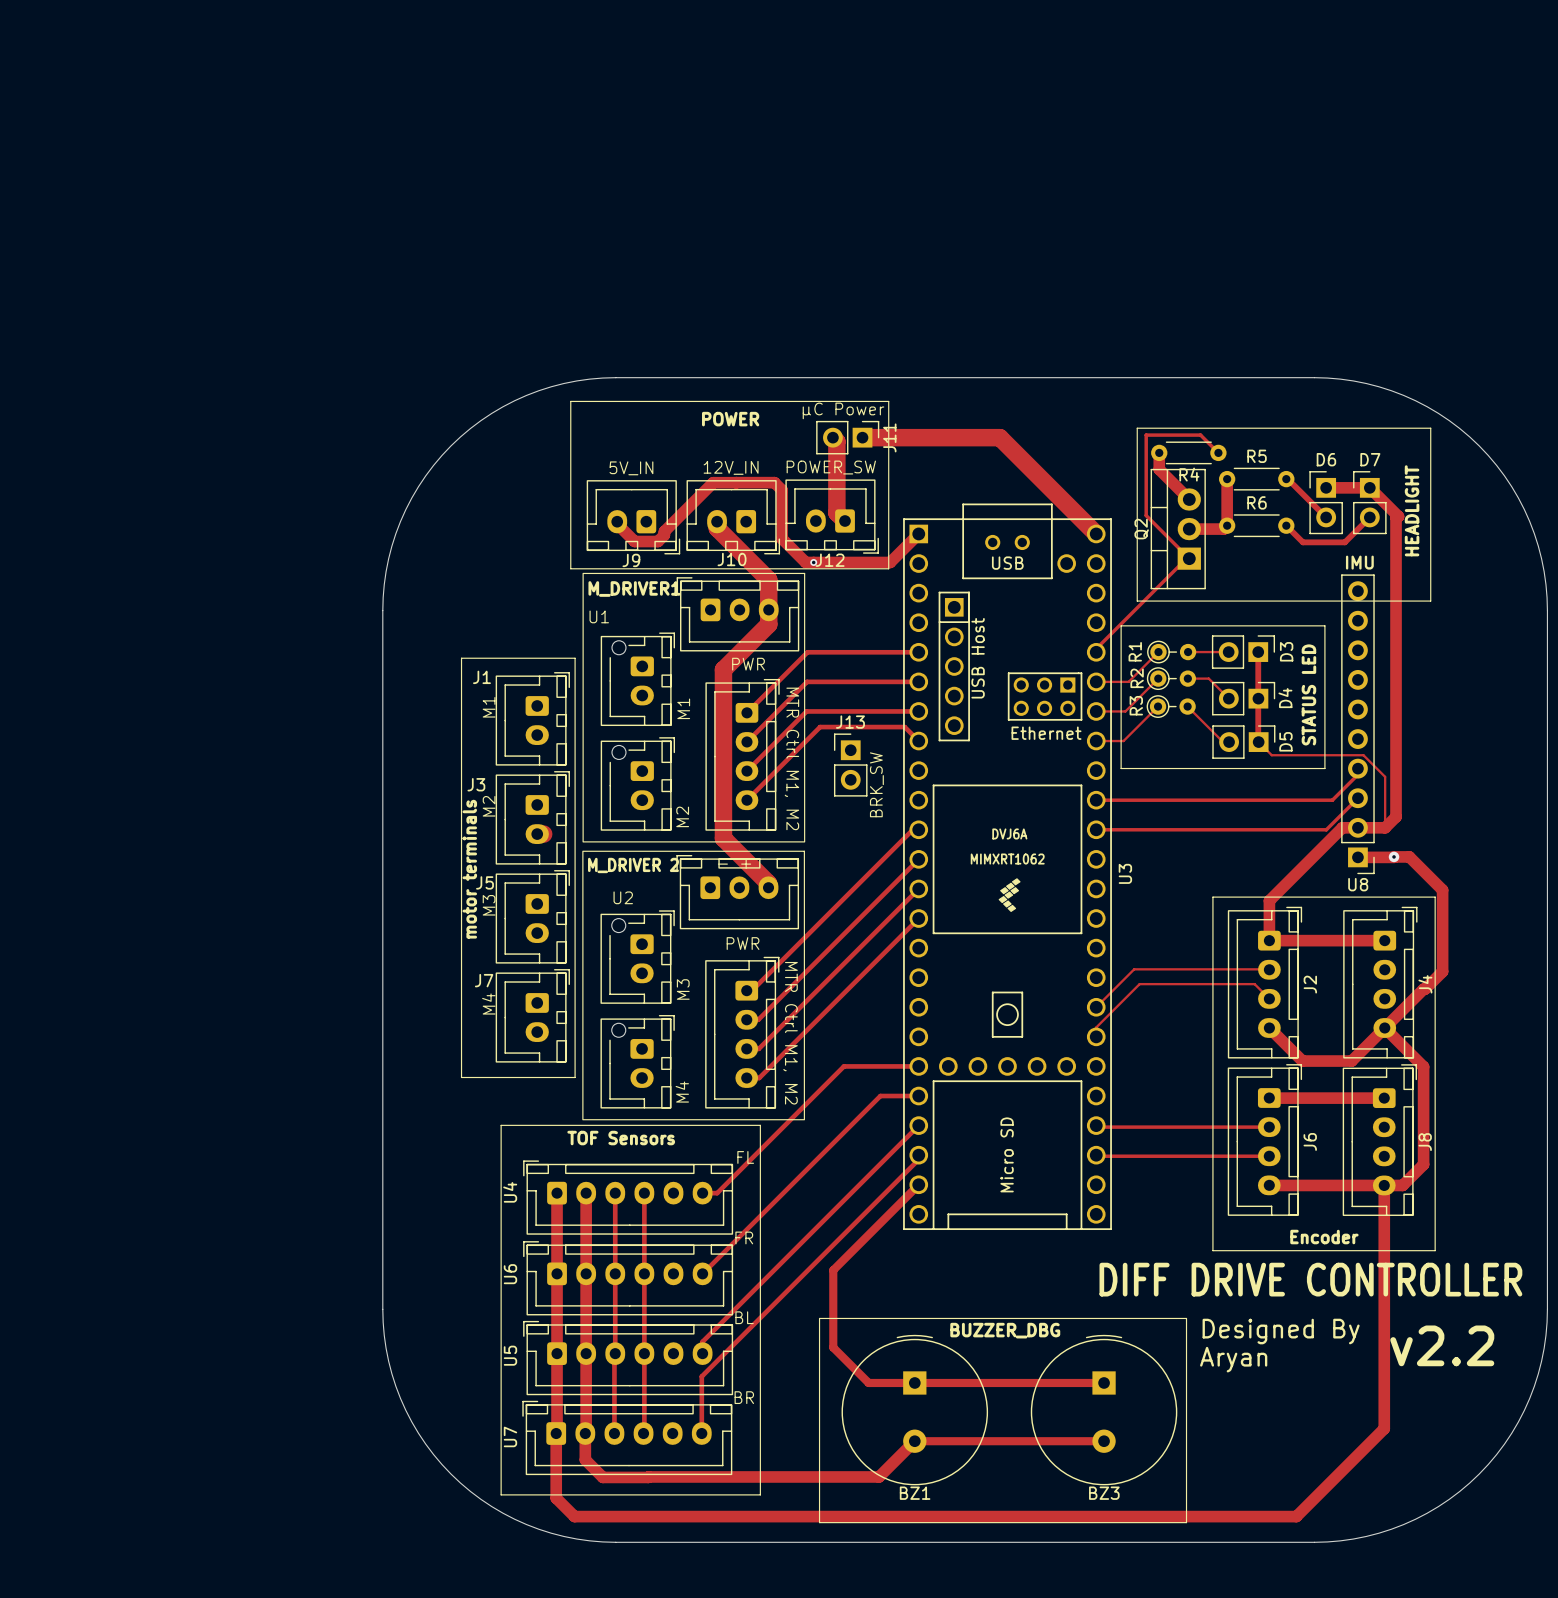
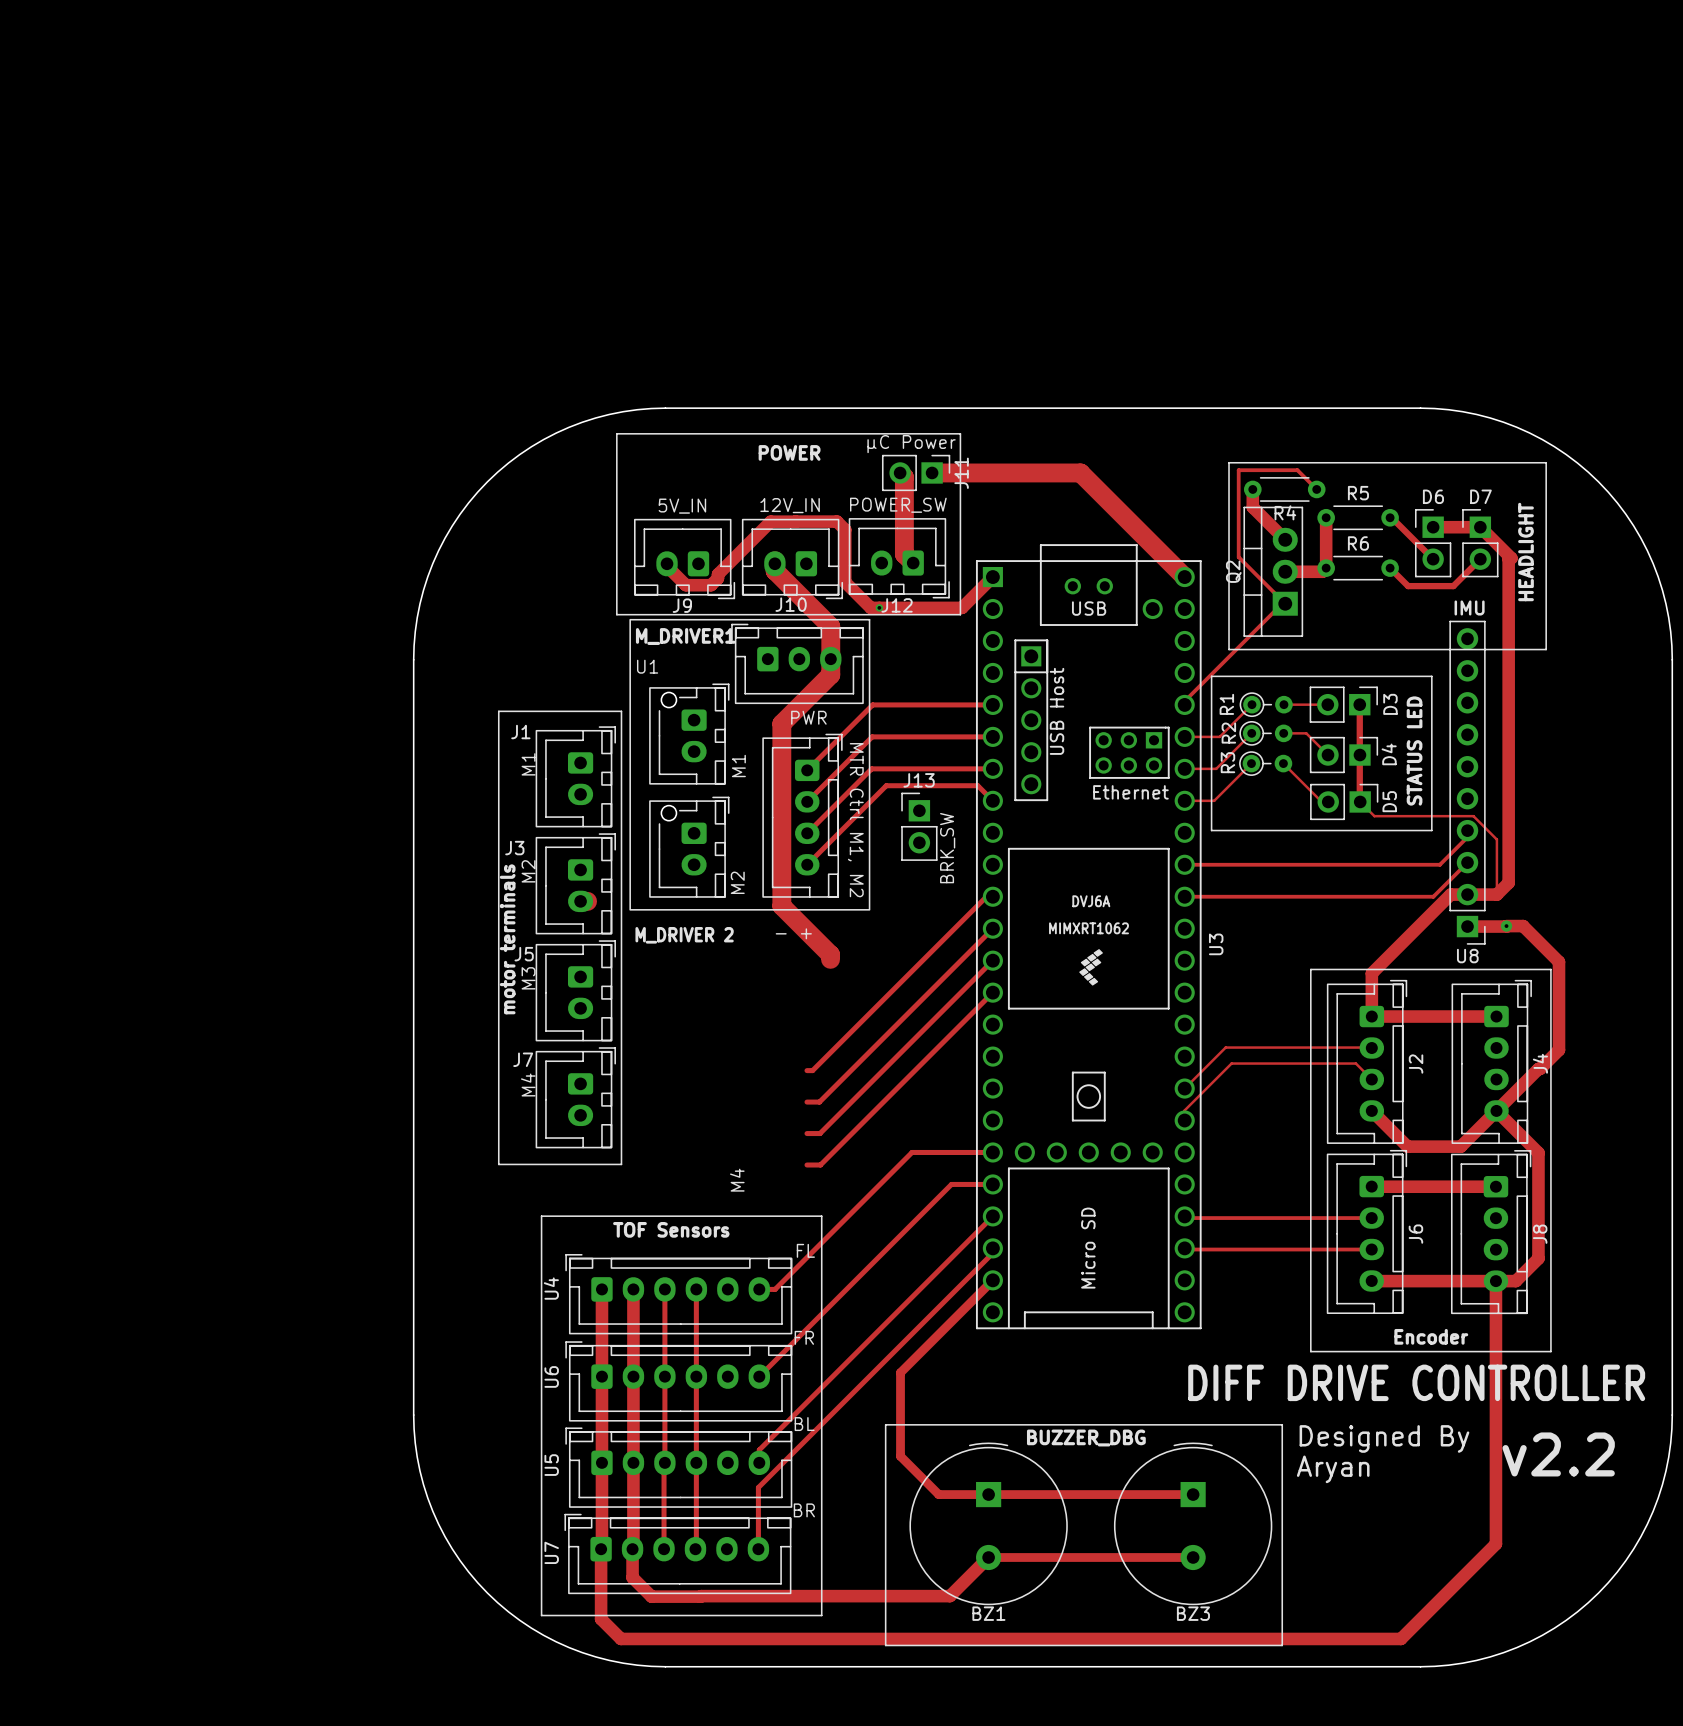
U2: (693, 985) -> none

